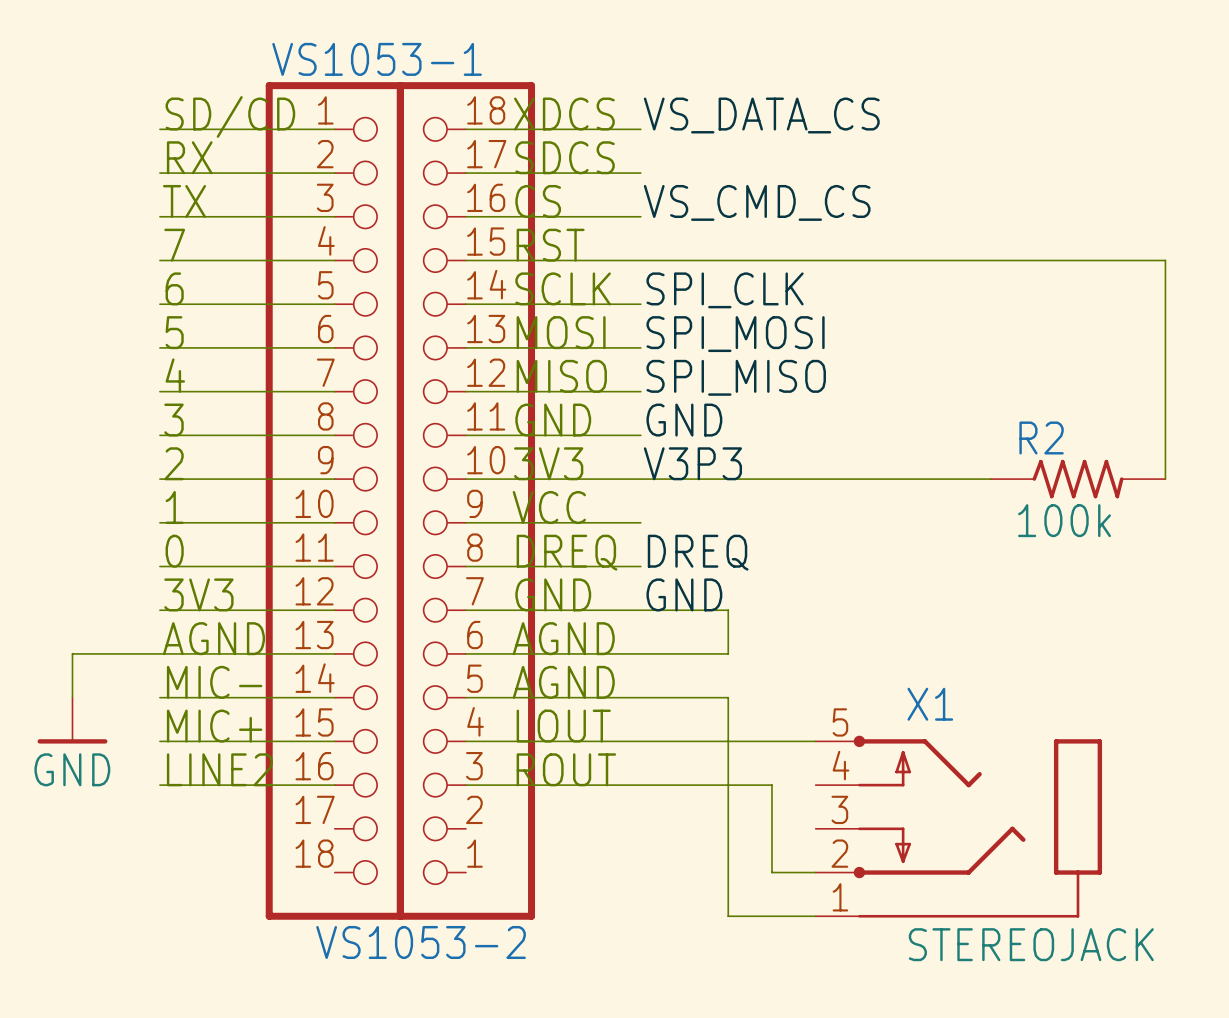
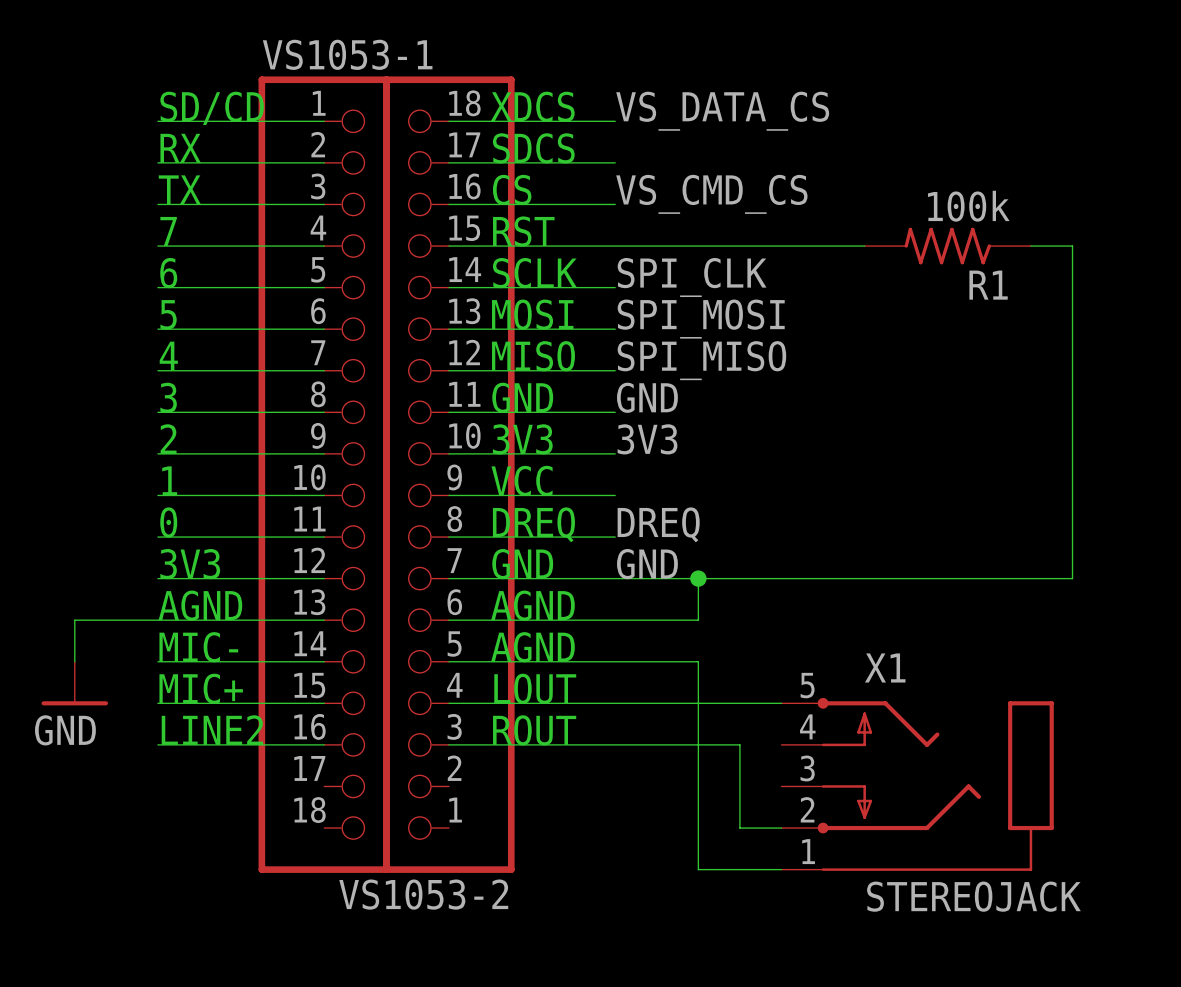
R1: none -> 100k (947, 246)
wire: (1121, 260) (1165, 260) (1165, 479) -> (1072, 246) (1072, 578) (698, 578)
label: V3P3 (692, 463) -> 3V3 (647, 439)
wire: (640, 479) (990, 479) -> none
R2: 100k (1078, 479) -> none
junction: none -> (698, 578)

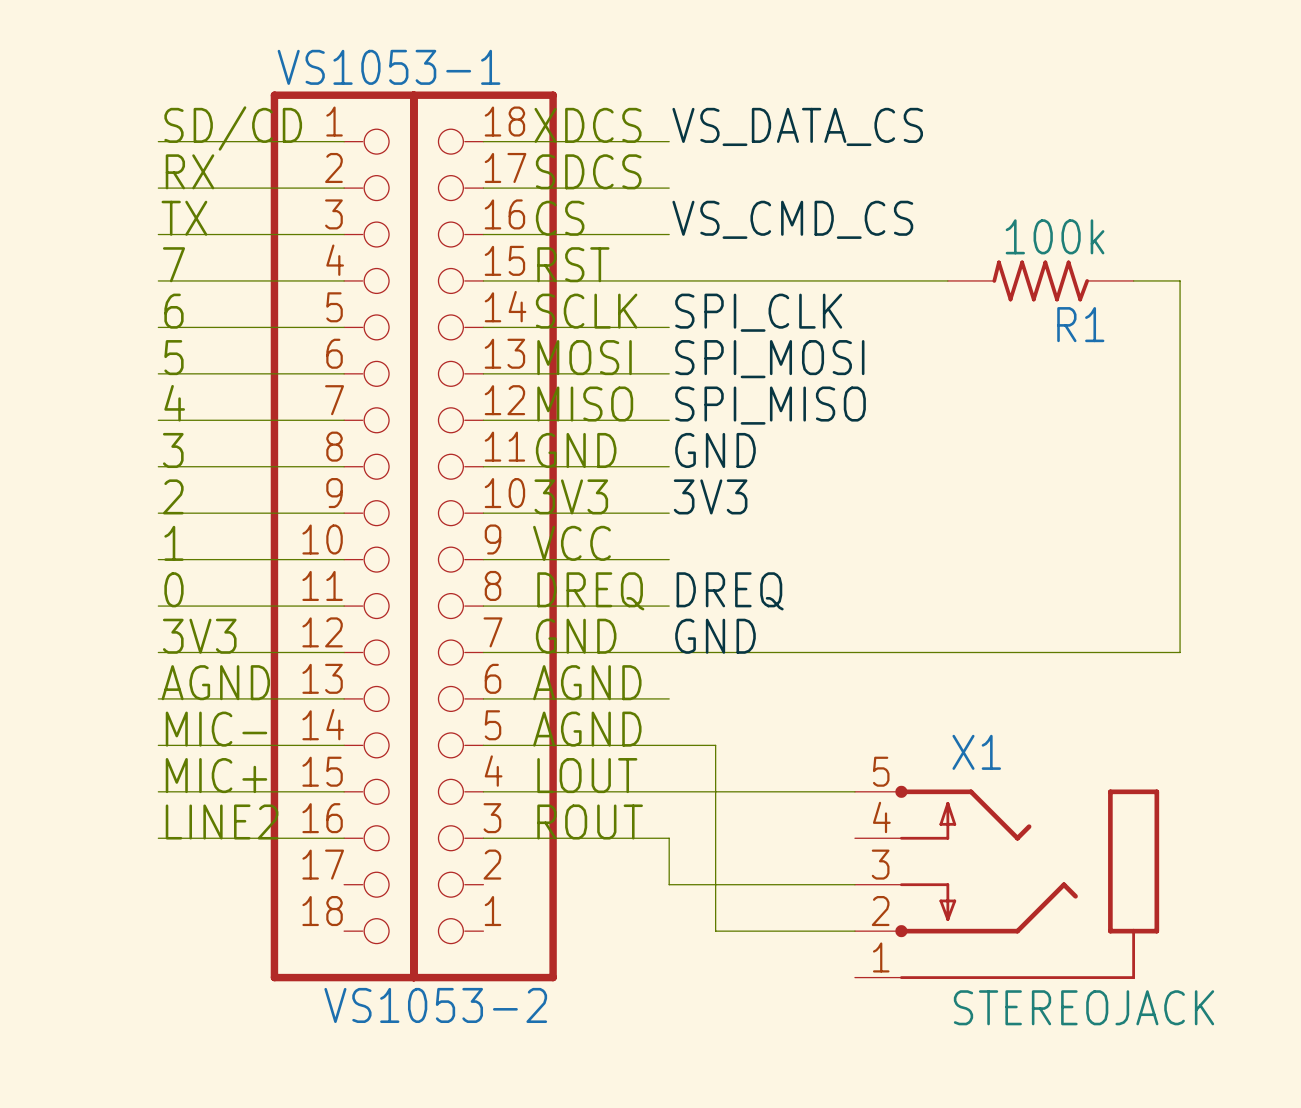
wire: (698, 578) (698, 620) (615, 620) -> none
junction: (698, 578) -> none
wire: (157, 620) (74, 620) (74, 661) -> none
wire: (656, 661) (698, 661) (698, 869) (781, 869) -> (715, 745) (715, 931) (808, 931)
power symbol: GND (74, 683) -> none
wire: (615, 744) (739, 744) (739, 828) -> (669, 838) (669, 884) (854, 884)

